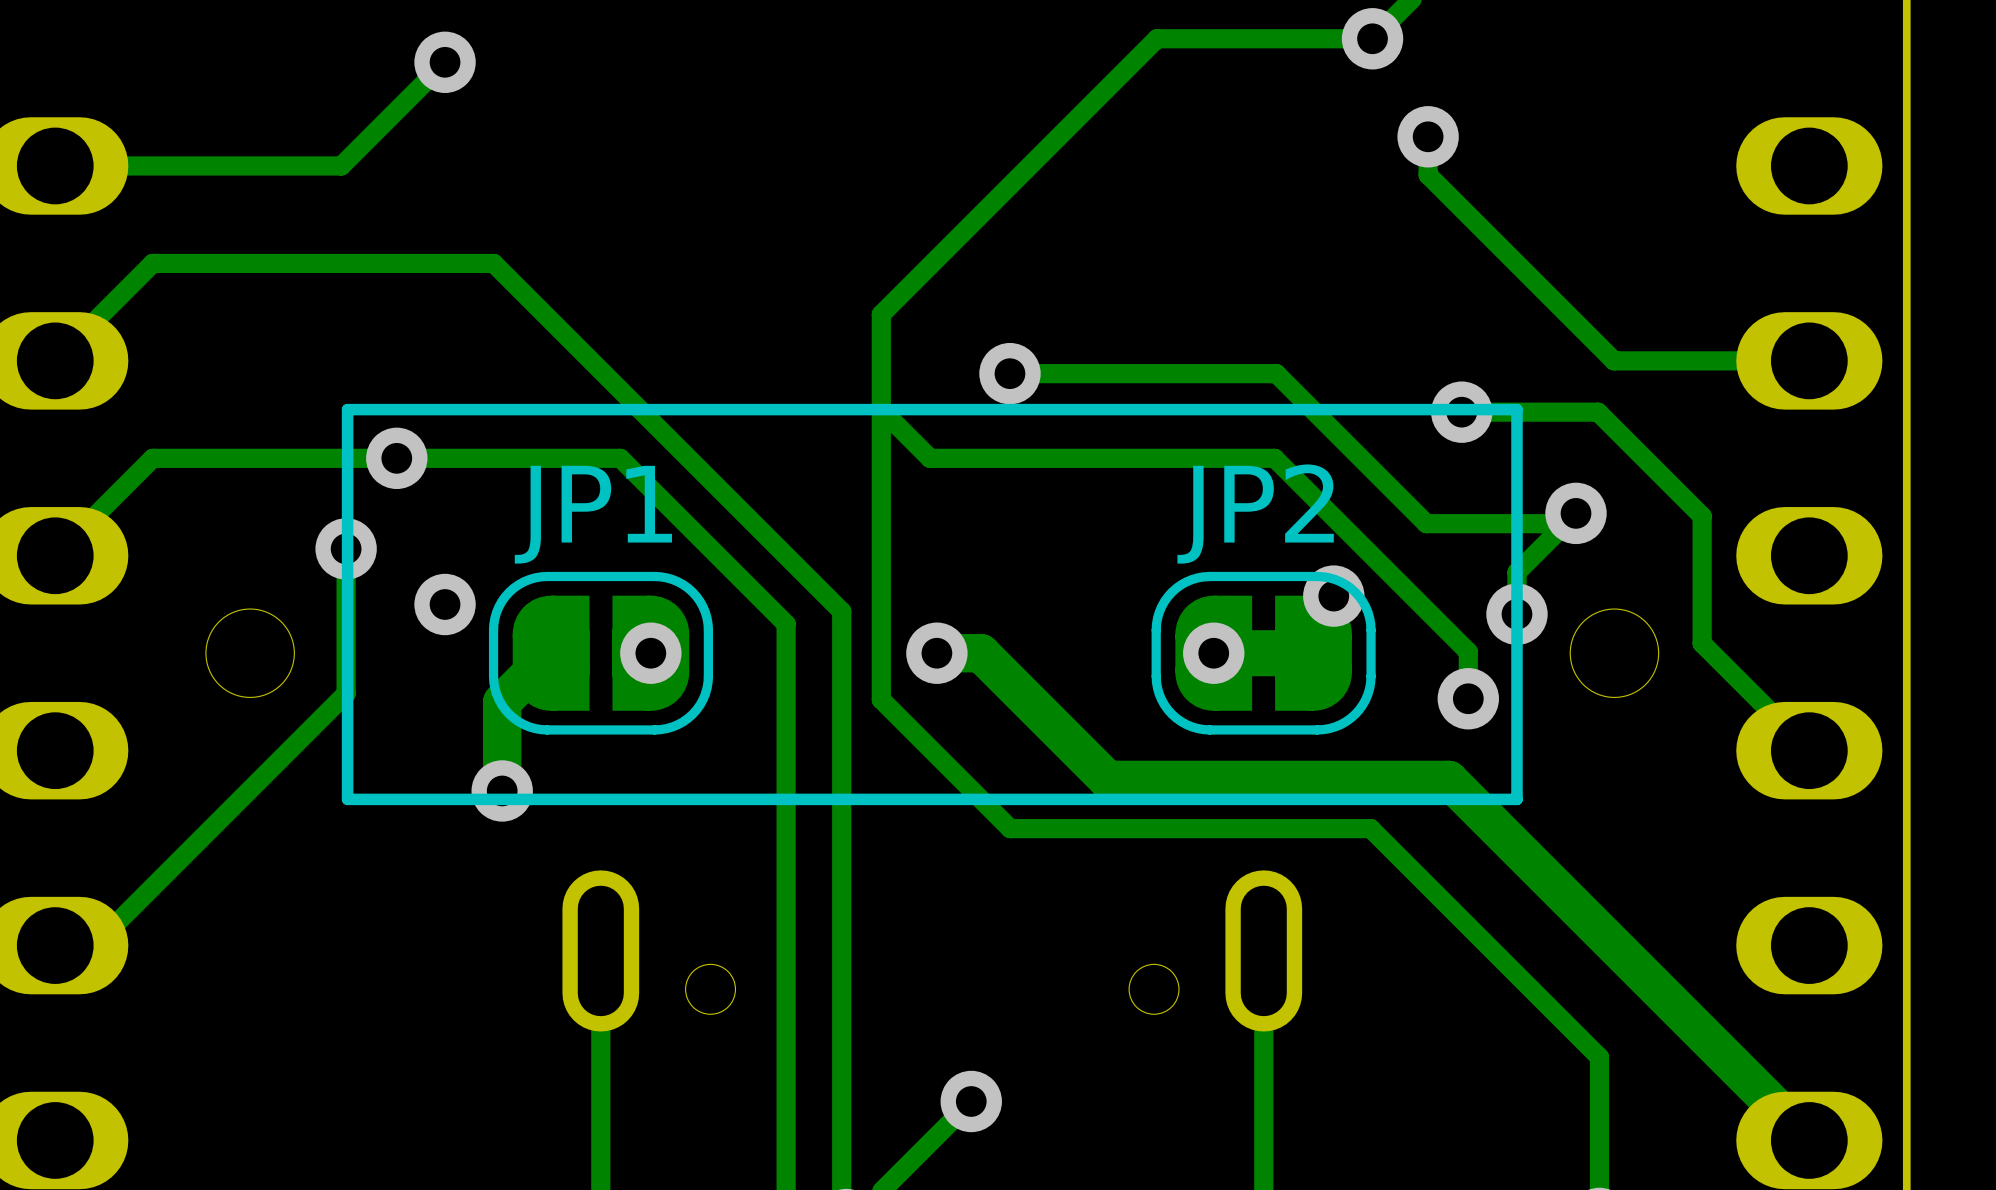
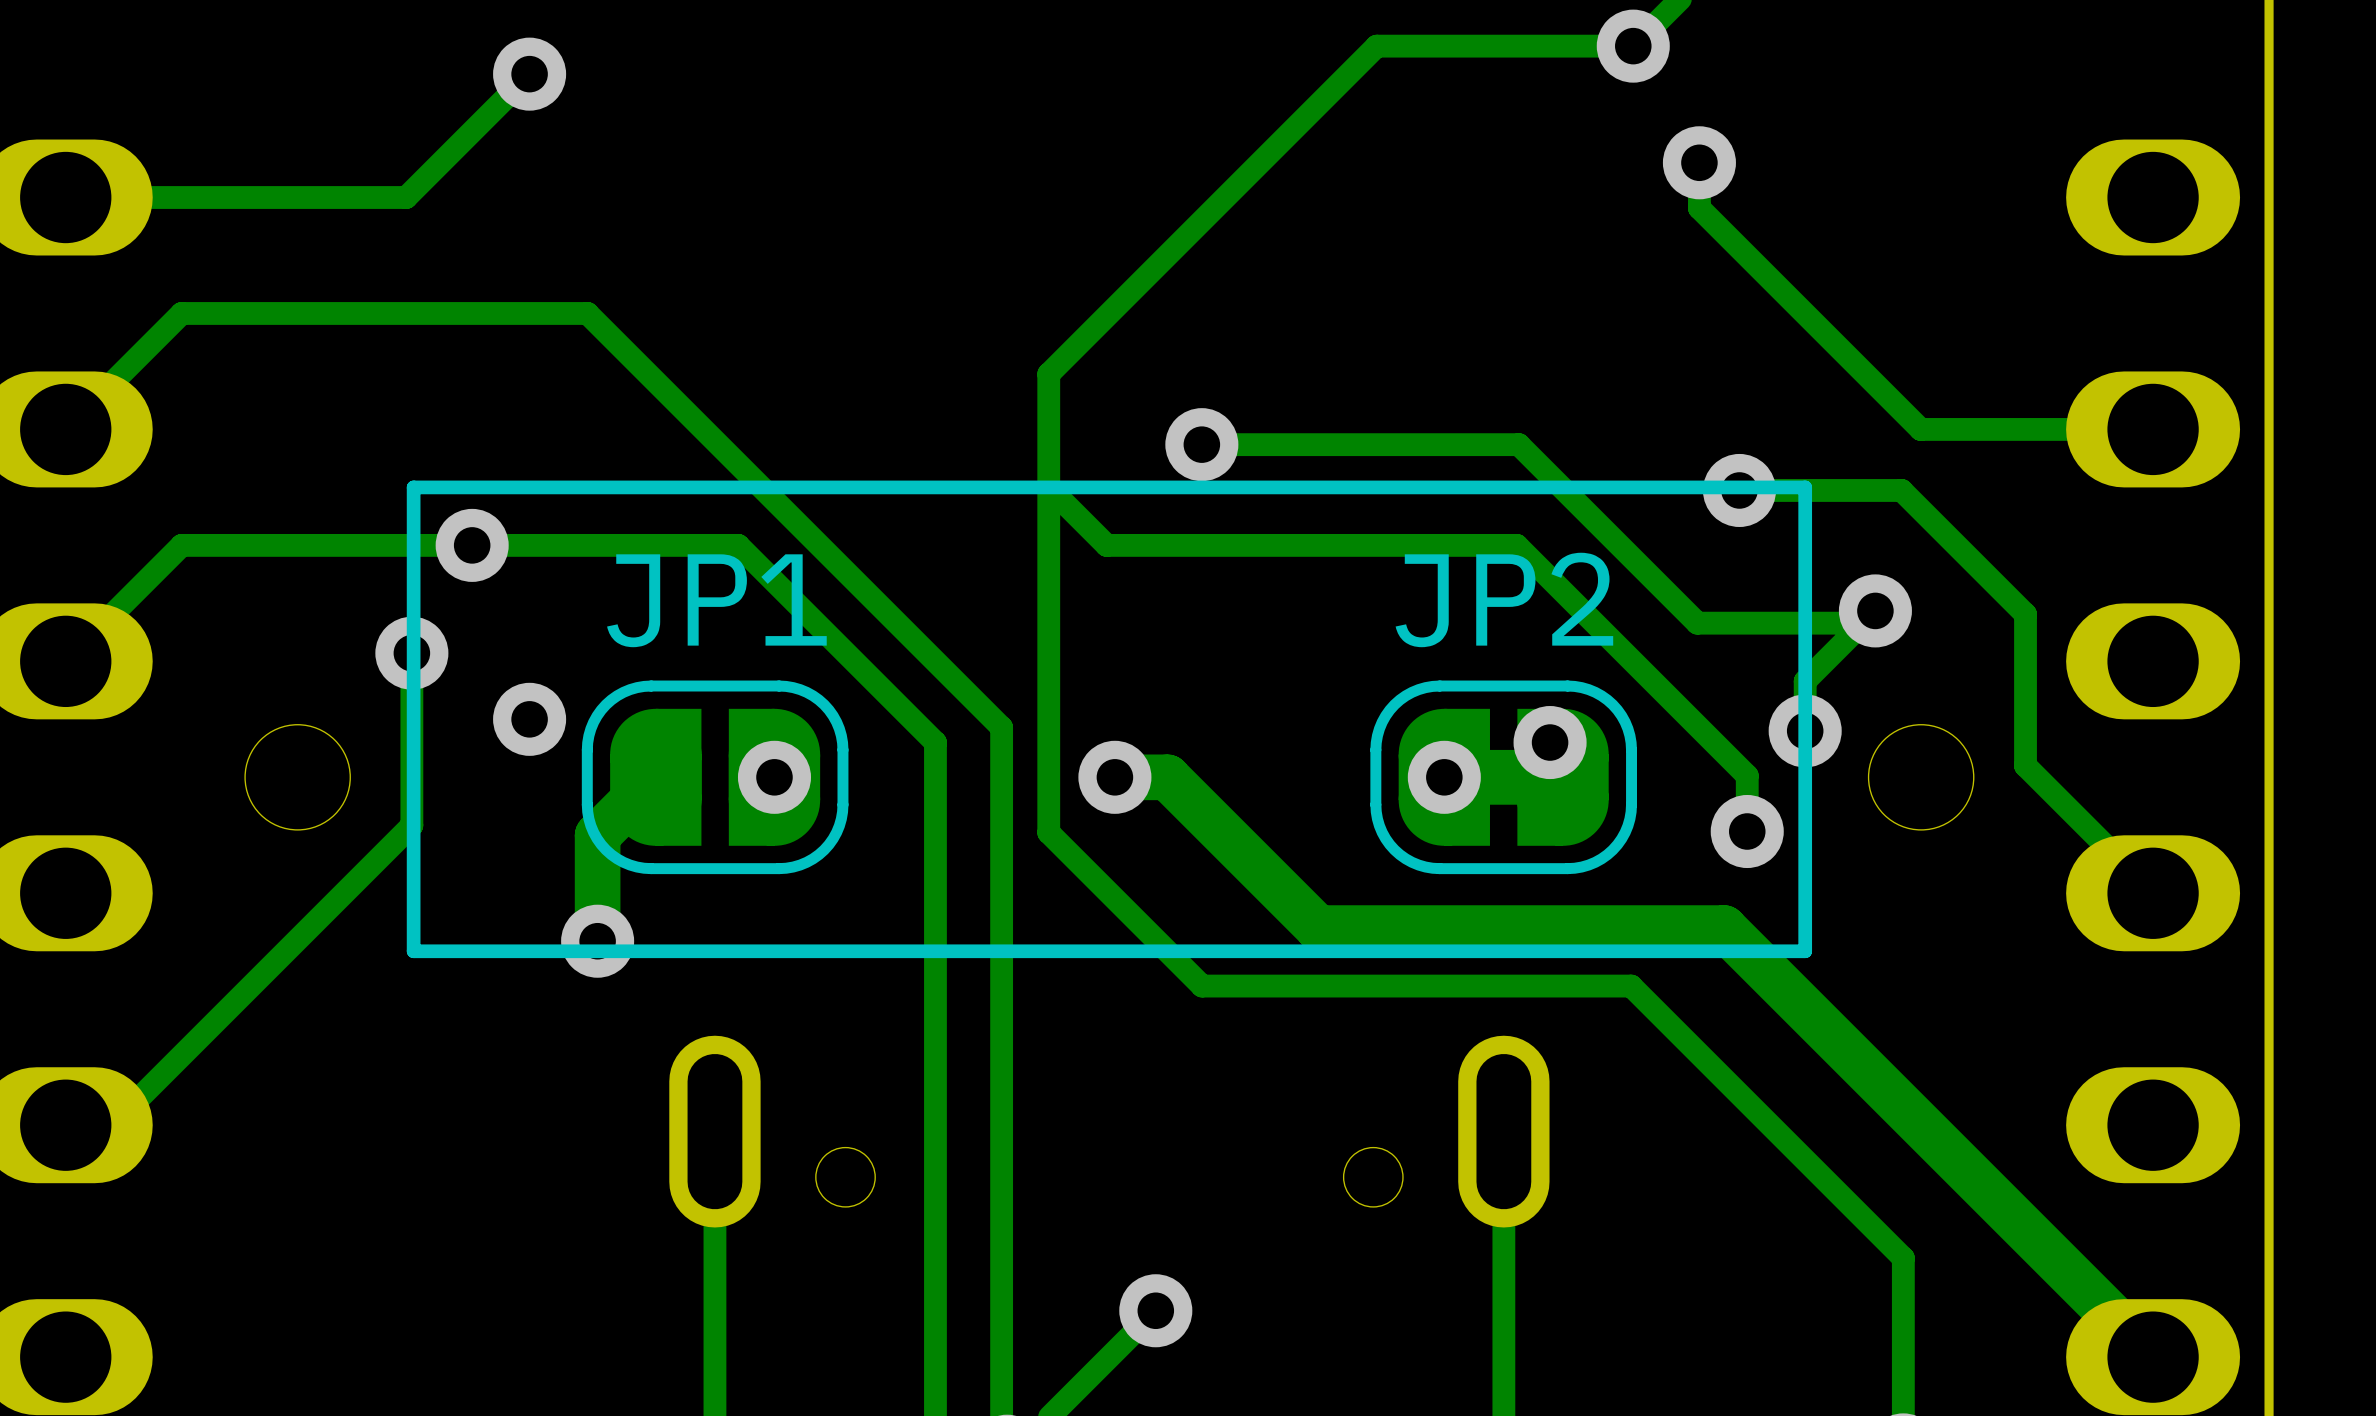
via position: (1333, 596) -> (1550, 742)

